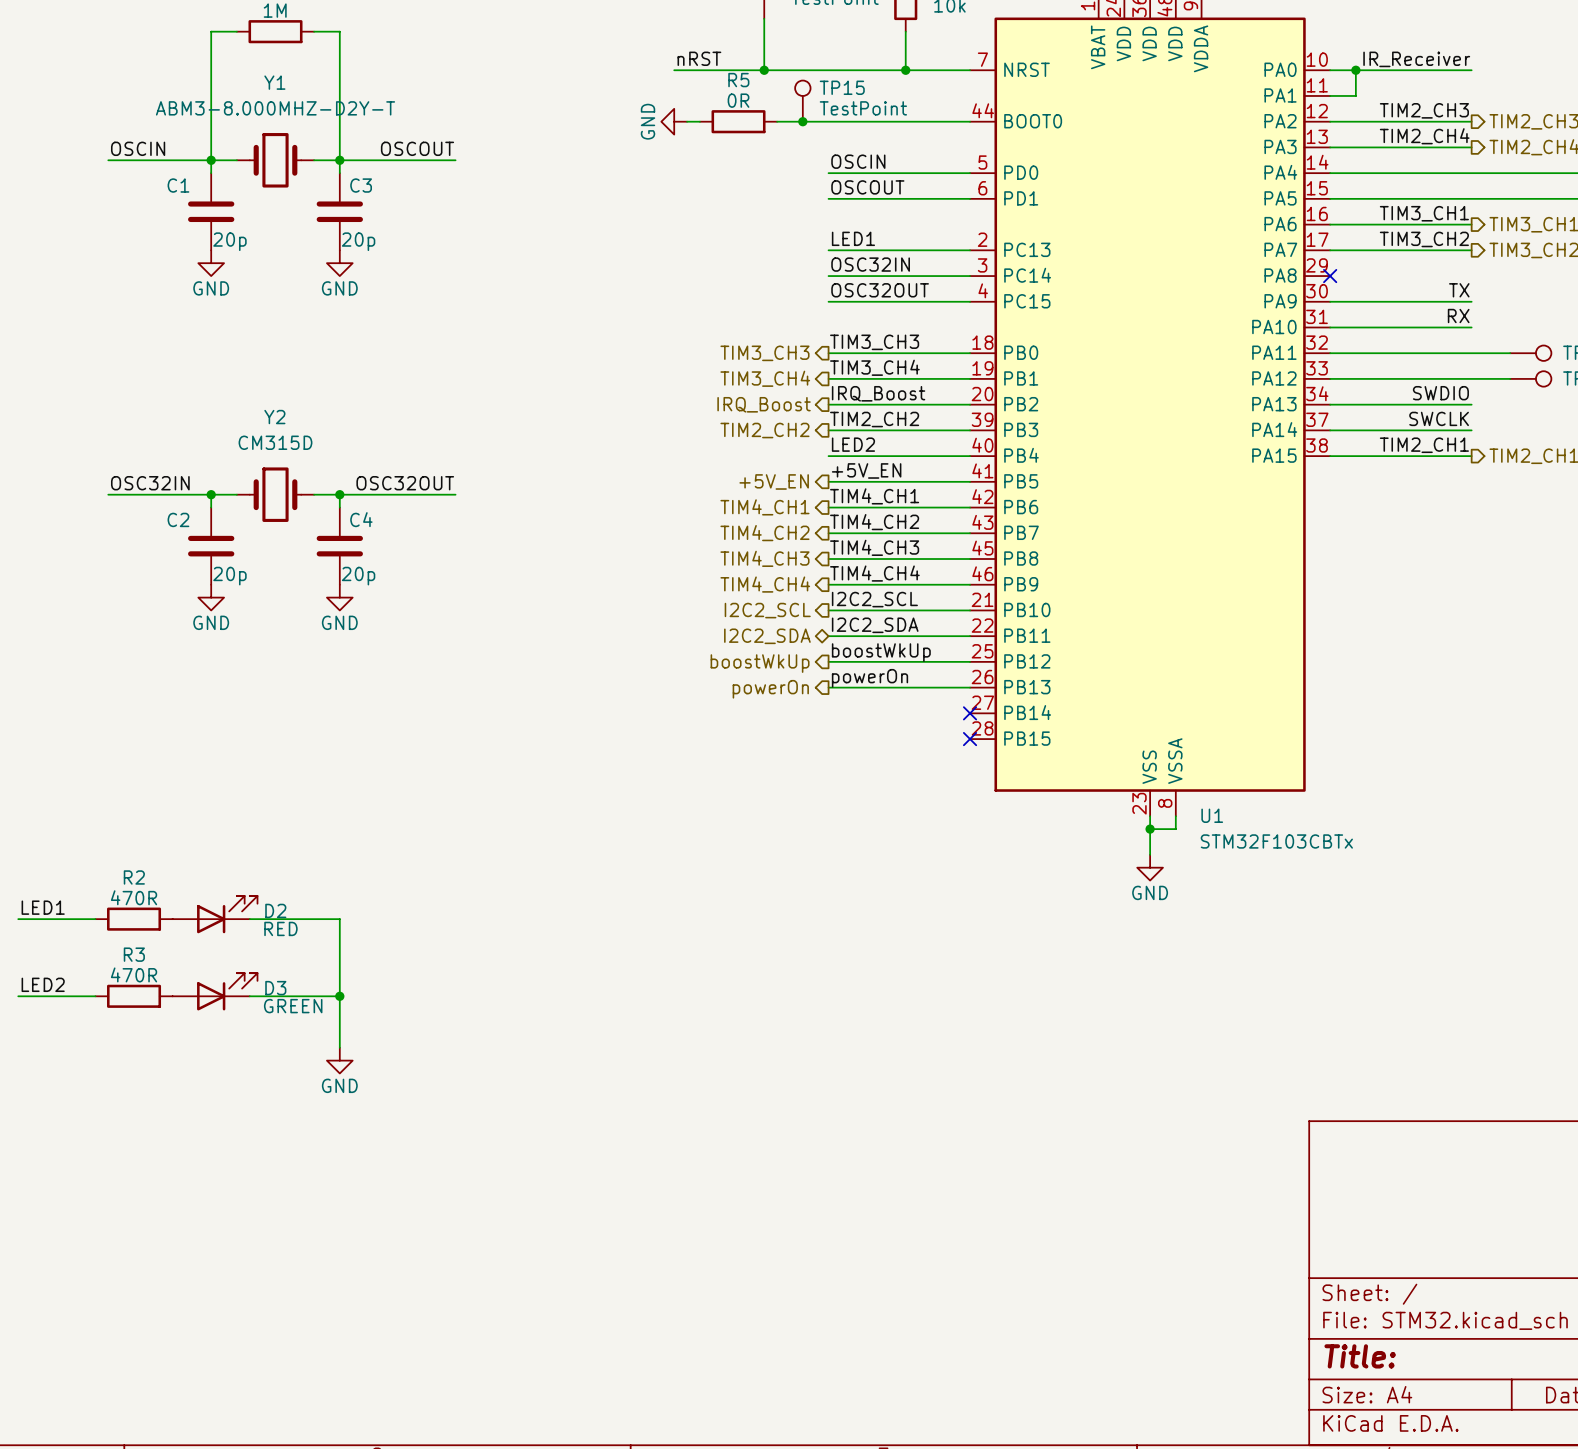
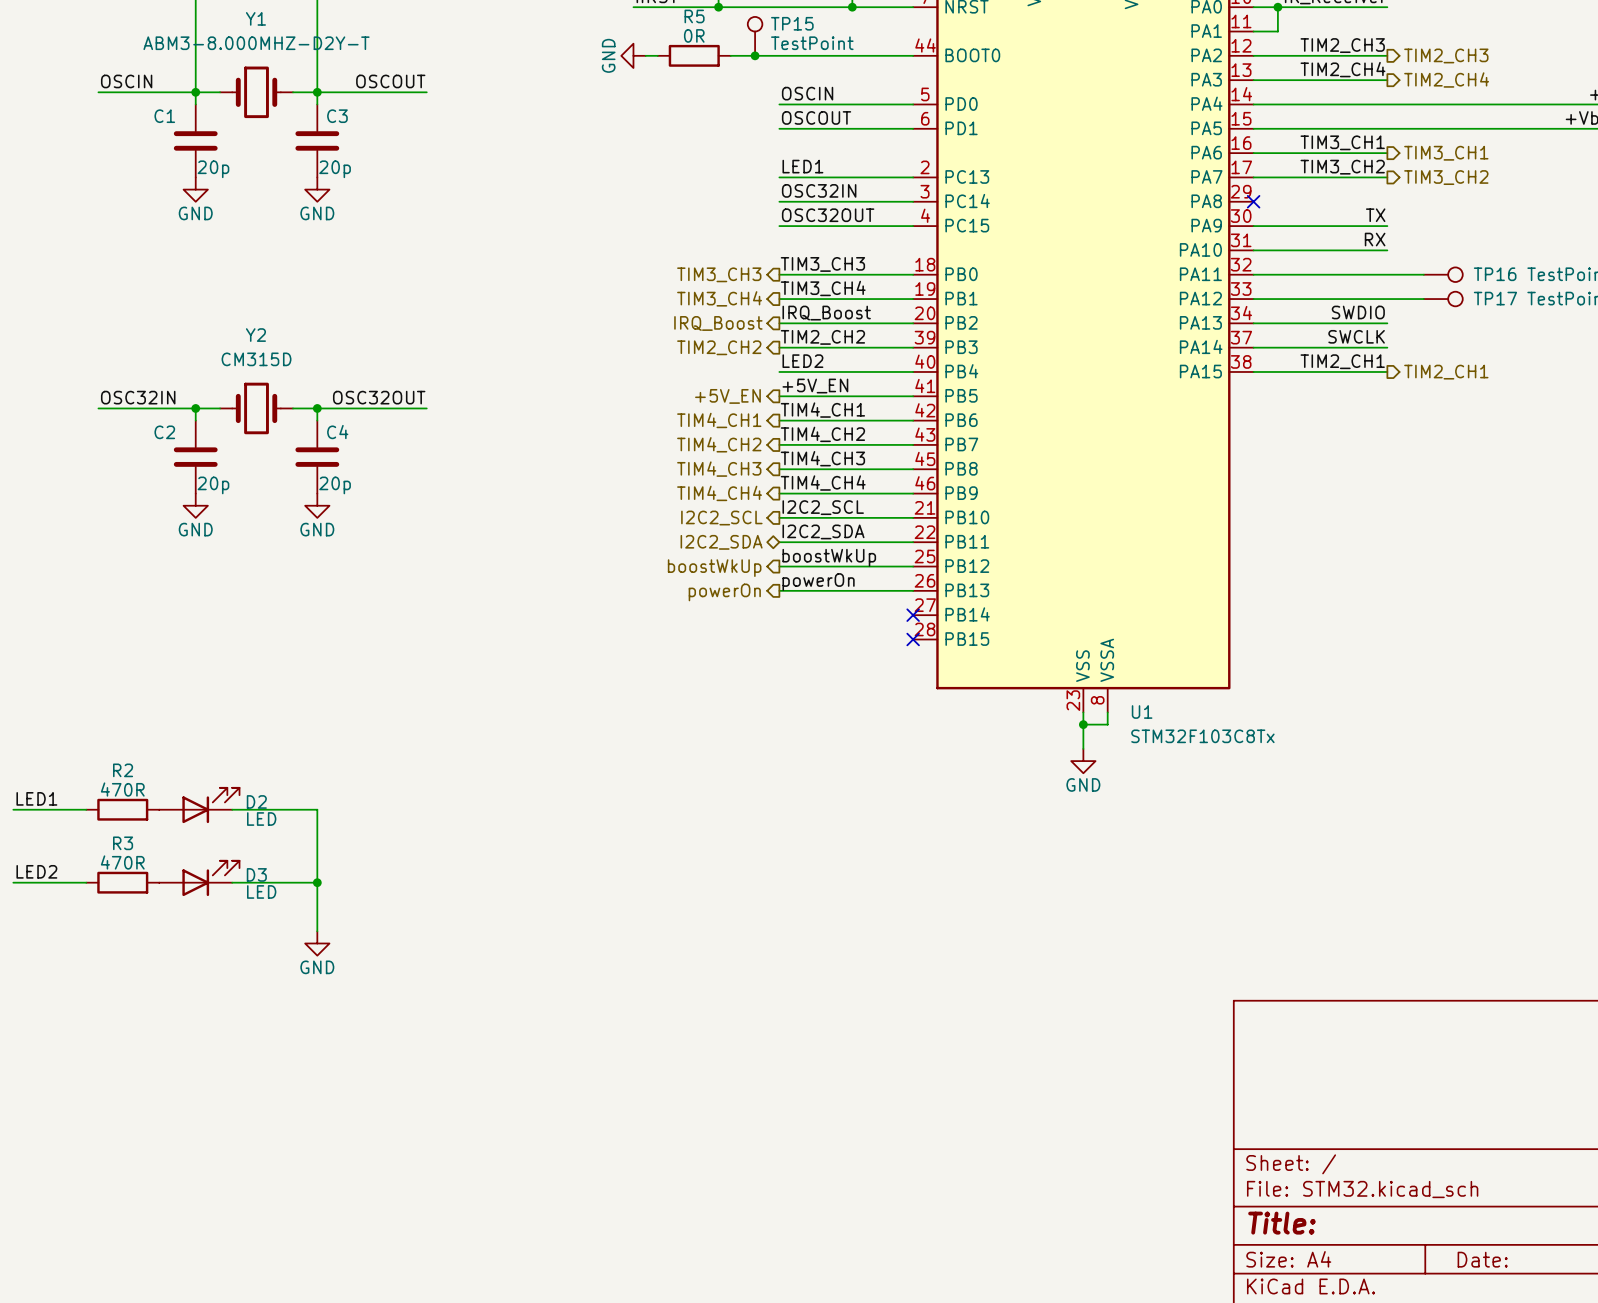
U1 value: STM32F103CBTx (1276, 841) -> STM32F103C8Tx (1202, 736)
D2 value: RED (280, 928) -> LED (261, 819)
D3 value: GREEN (293, 1006) -> LED (261, 891)

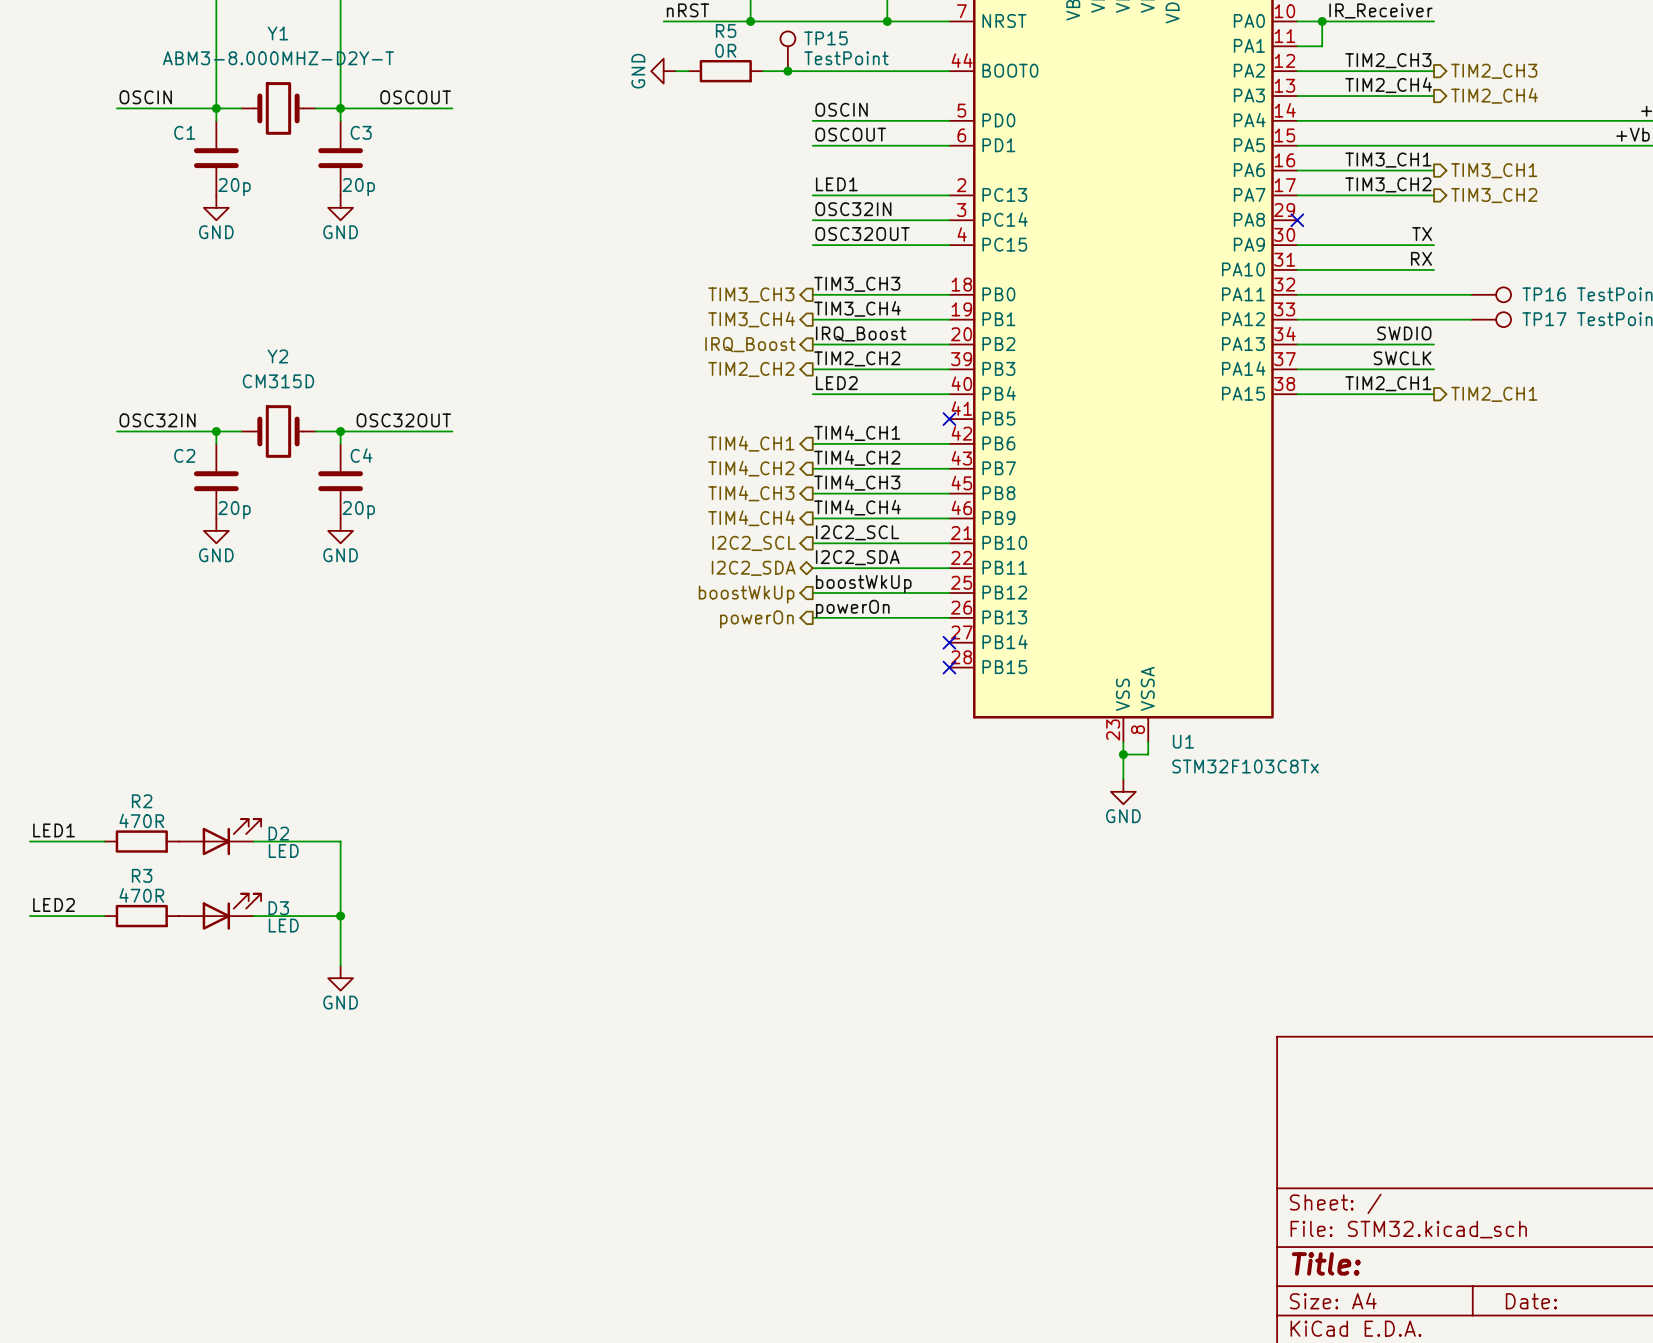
label: +5V_EN (815, 386) -> none
hierarchical label: +5V_EN (727, 396) -> none
wire: (779, 396) (913, 396) -> none
no-connect mark: none -> (949, 419)

